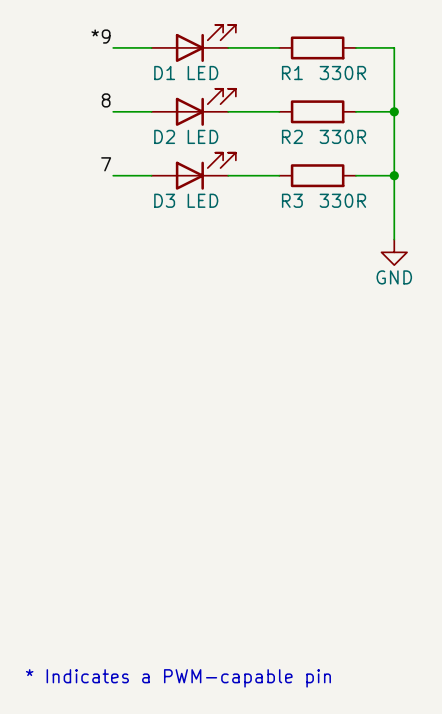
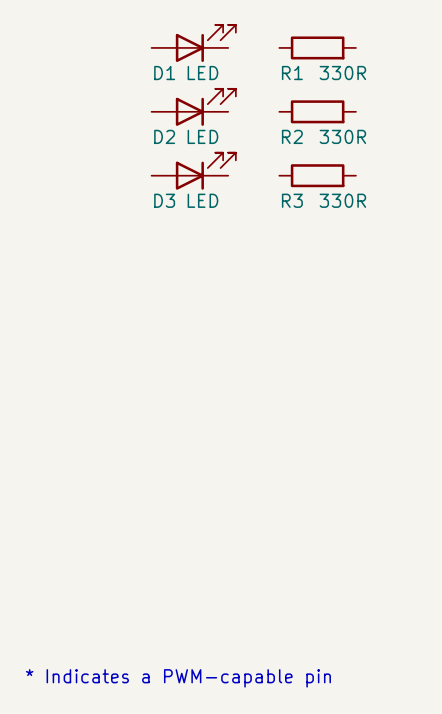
label: *9 (100, 36) -> none
wire: (113, 47) (151, 47) -> none
wire: (228, 47) (279, 47) -> none
wire: (355, 47) (394, 47) (394, 239) -> none
label: 8 (106, 100) -> none
wire: (113, 111) (151, 111) -> none
wire: (228, 111) (279, 111) -> none
wire: (355, 111) (394, 111) -> none
junction: (394, 111) -> none
label: 7 (106, 164) -> none
wire: (113, 175) (151, 175) -> none
wire: (228, 175) (279, 175) -> none
wire: (355, 175) (394, 175) -> none
junction: (394, 175) -> none
power symbol: GND (394, 252) -> none

